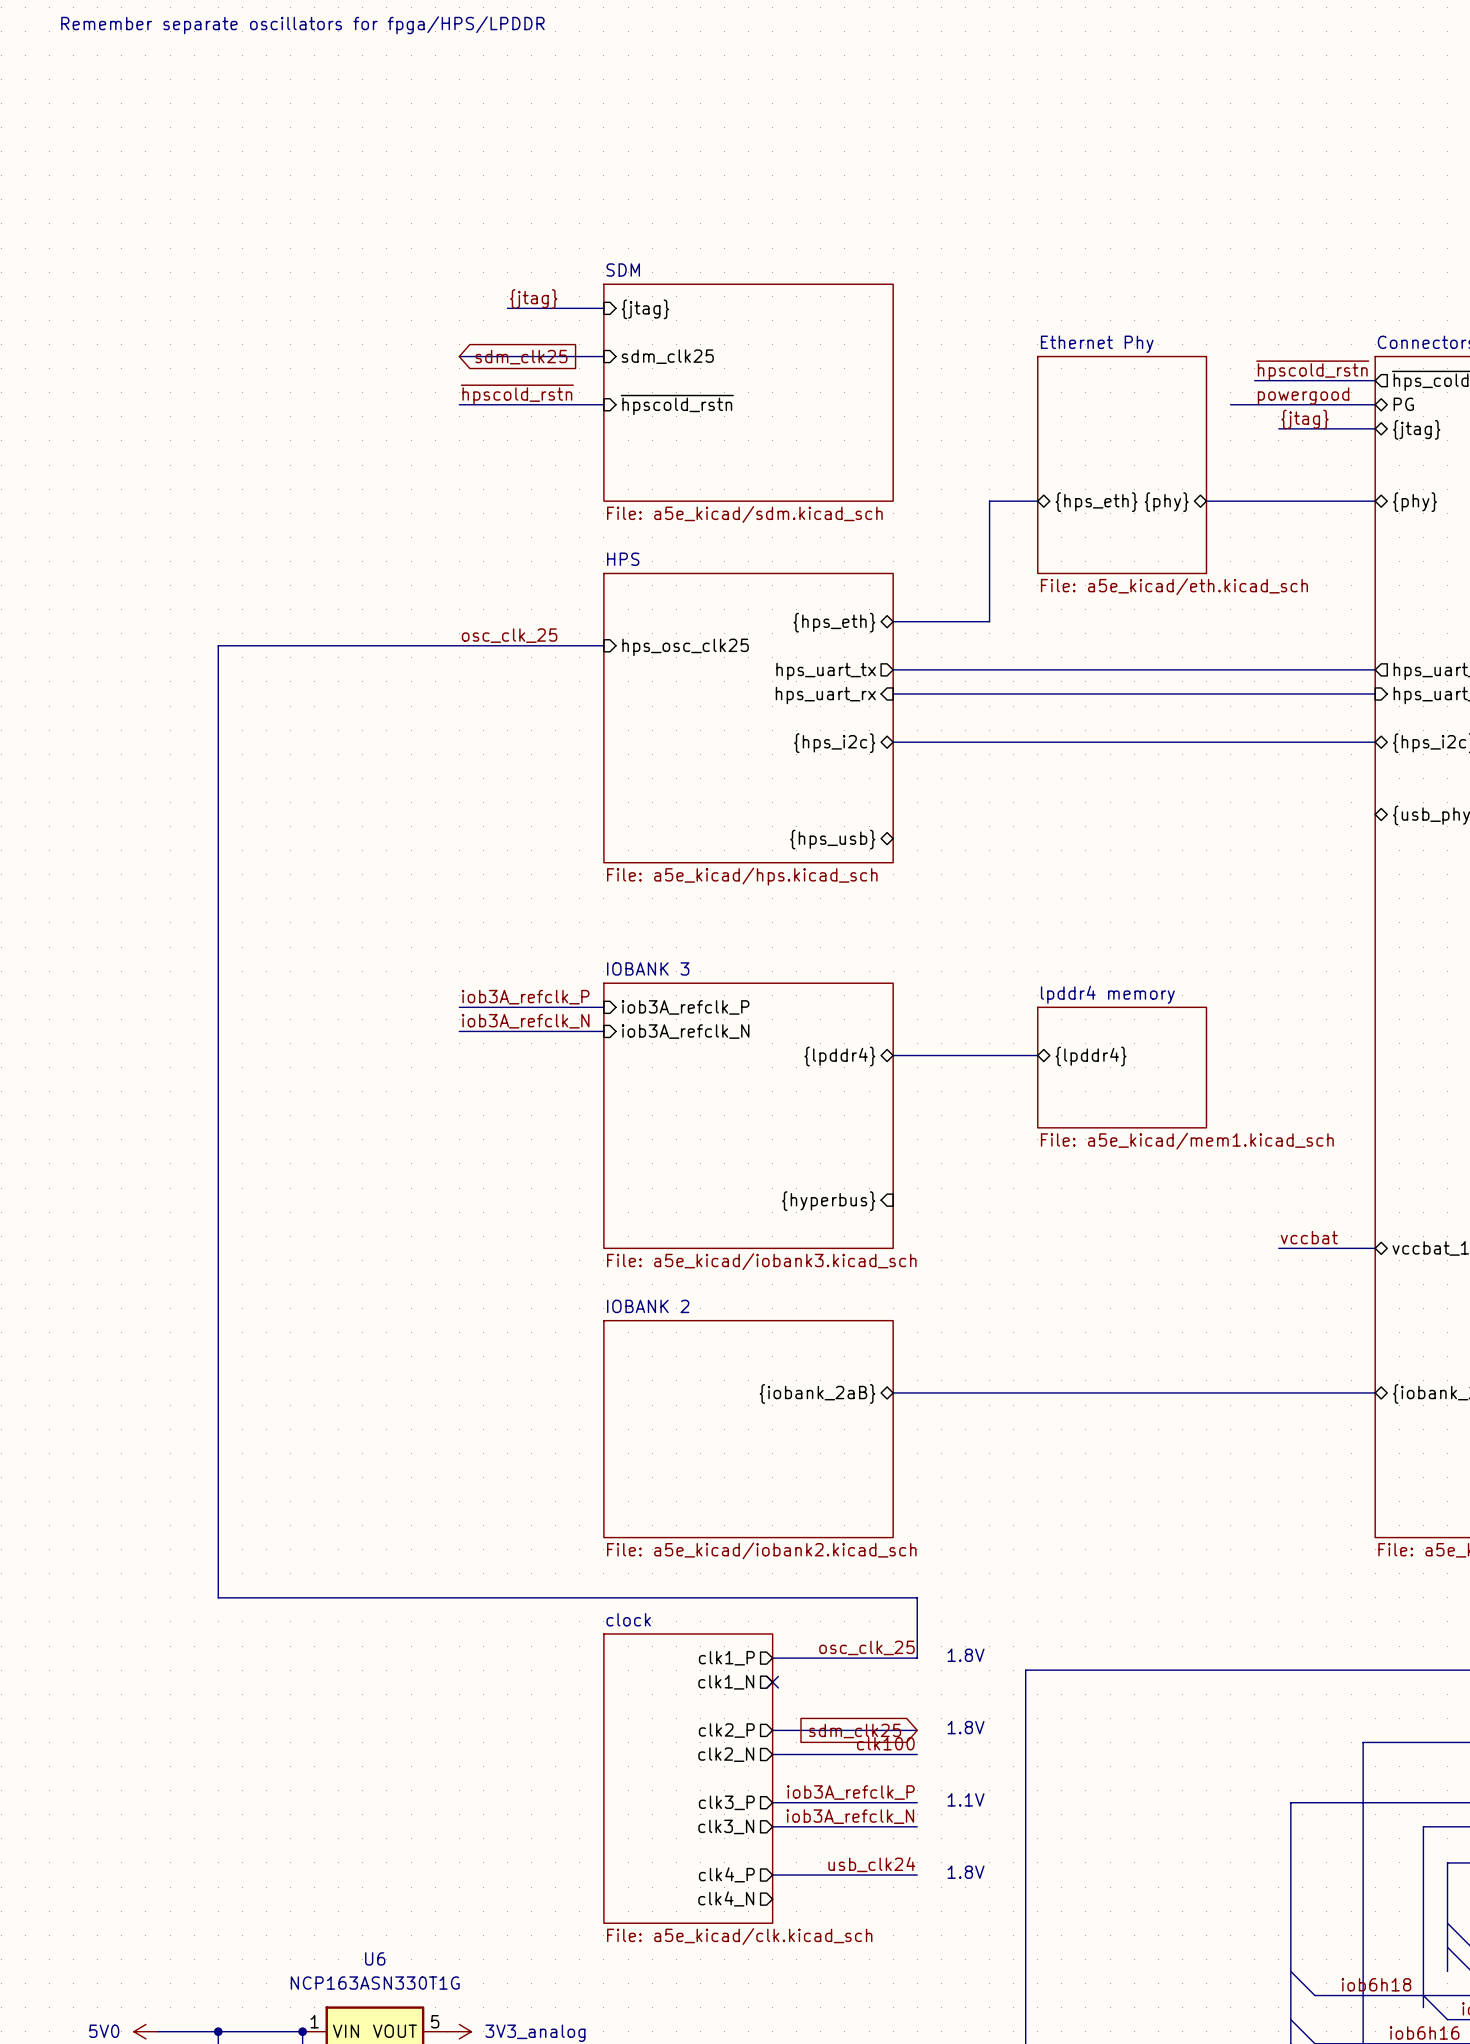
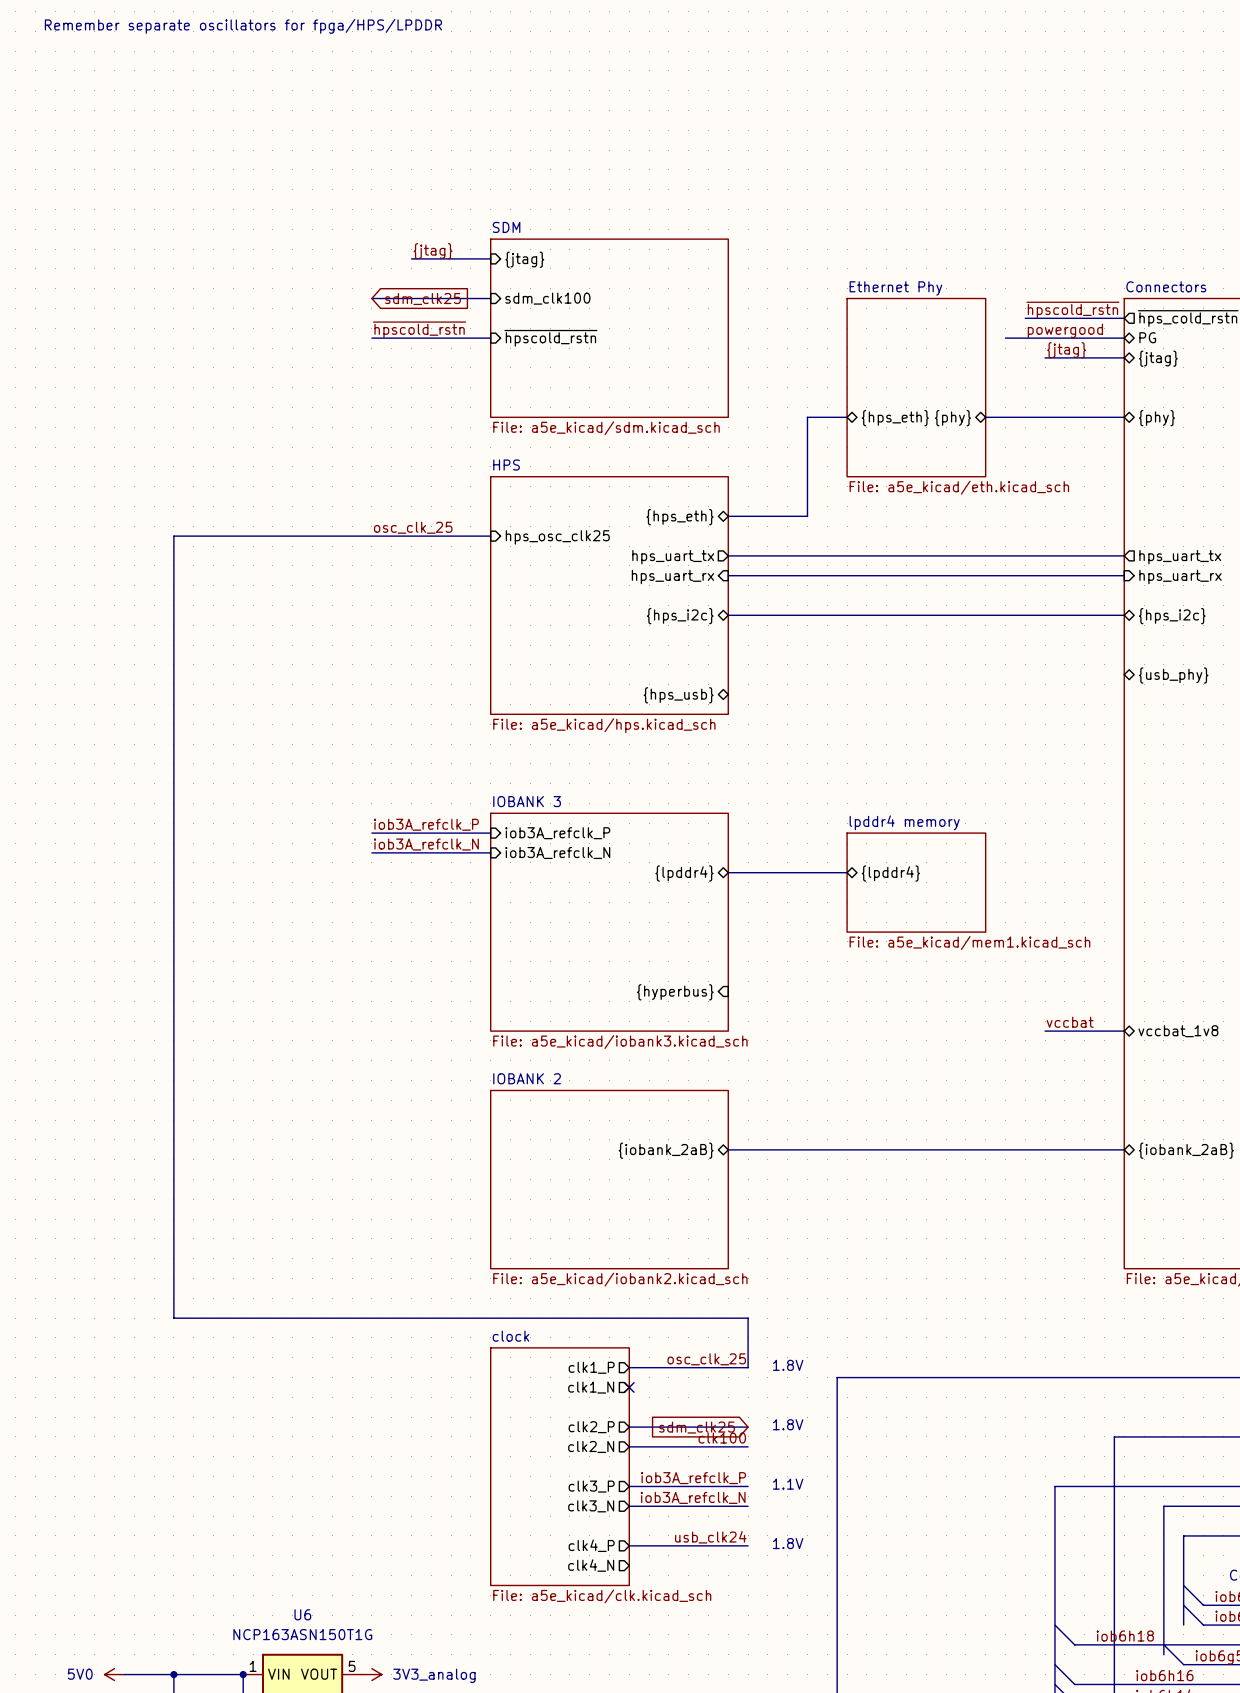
sheet pin: sdm_clk25 (667, 356) -> sdm_clk100 (547, 298)
U6 value: NCP163ASN330T1G (375, 1983) -> NCP163ASN150T1G (302, 1634)

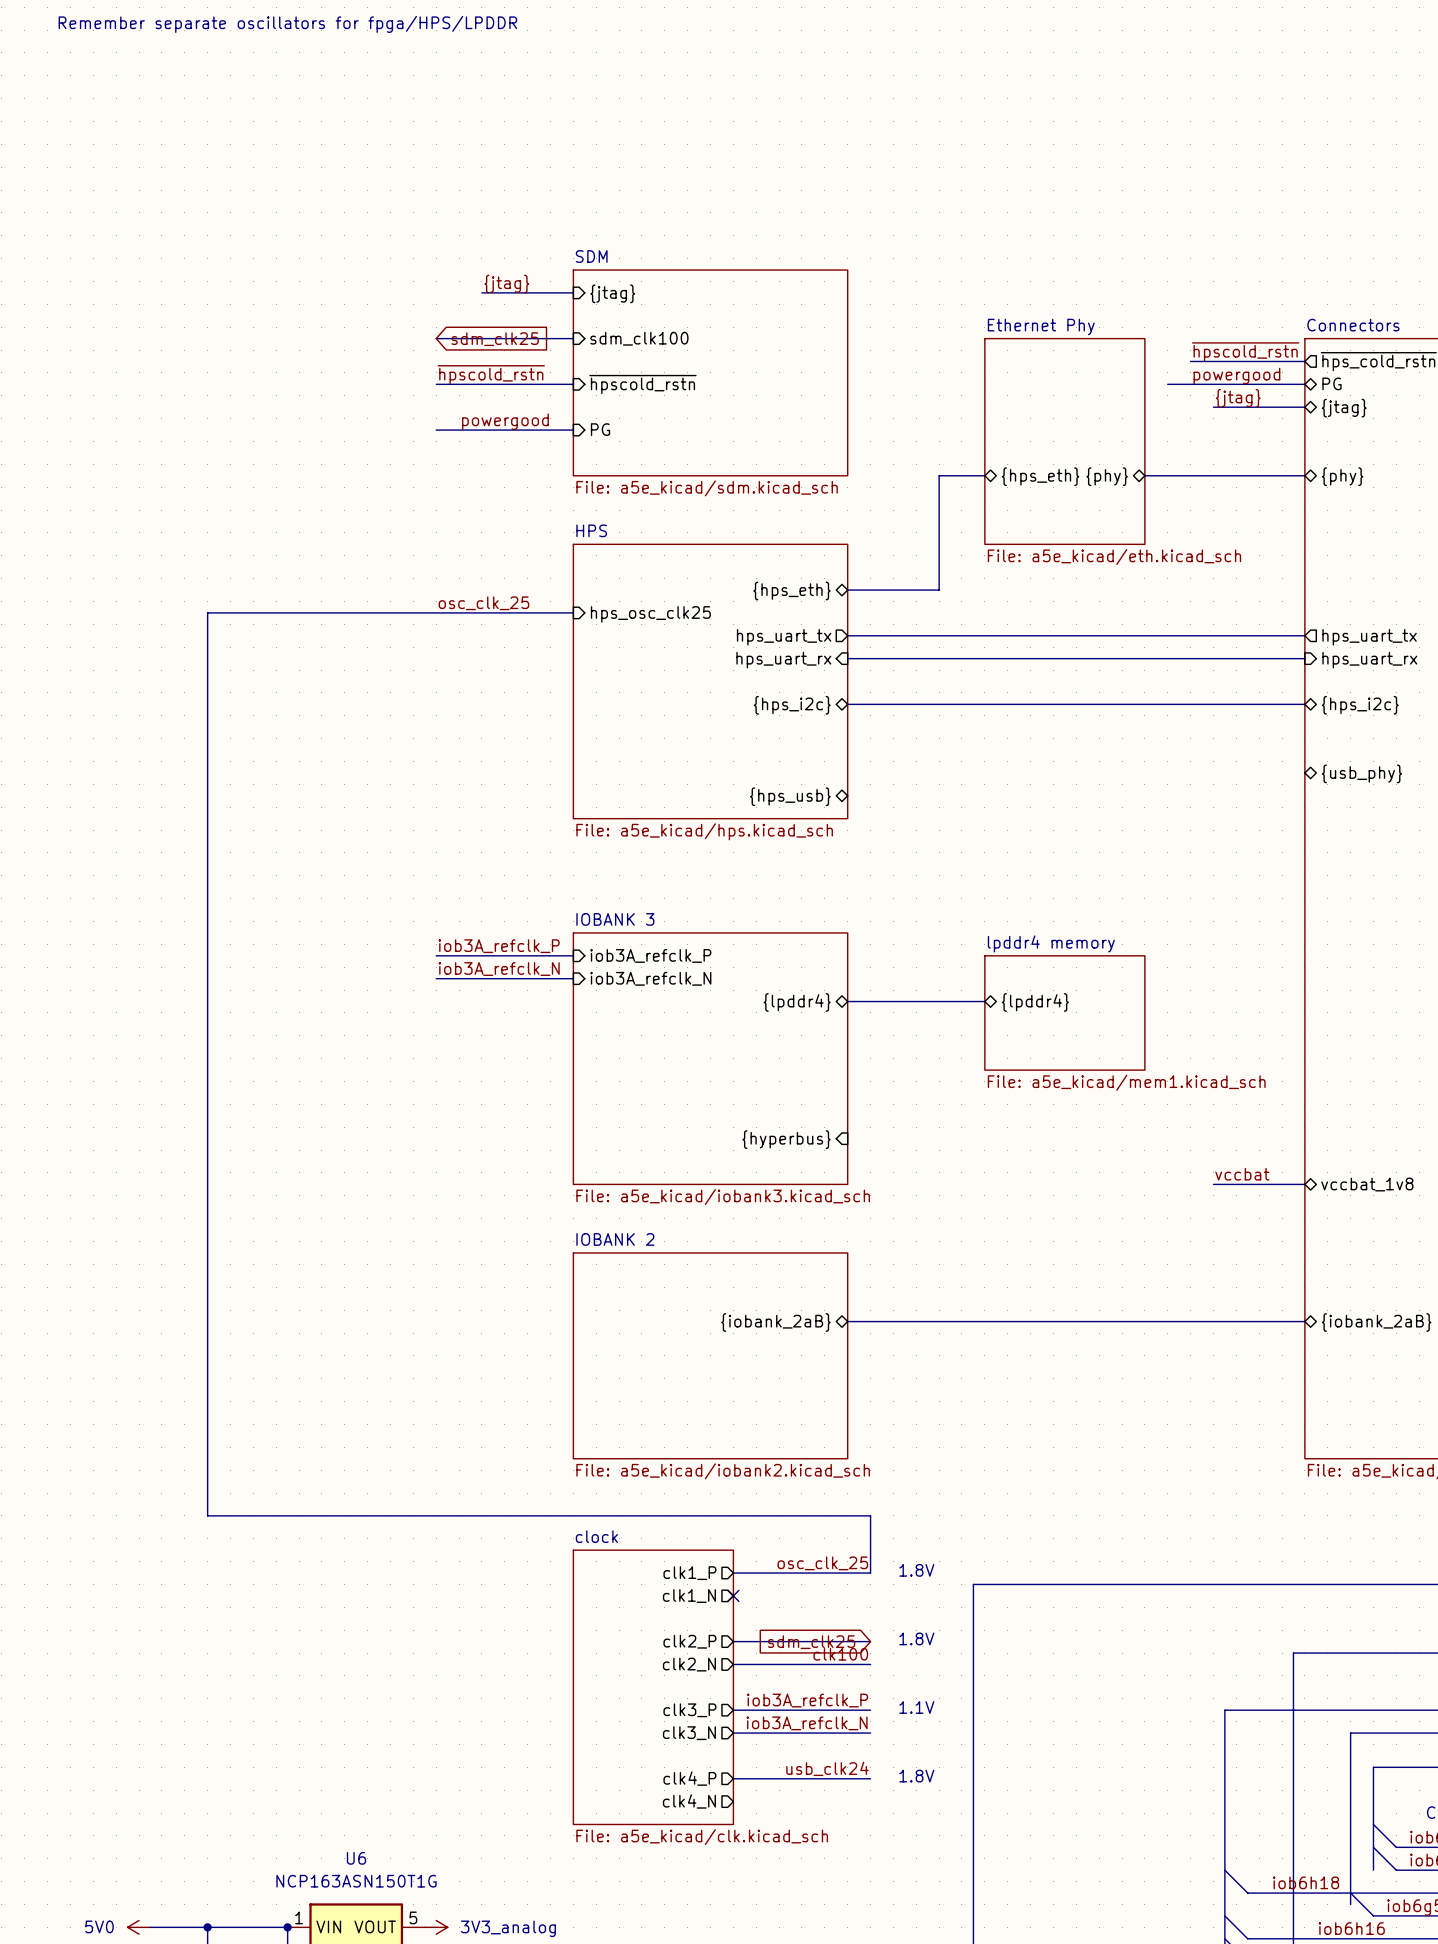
label: none -> powergood (505, 421)
wire: none -> (436, 430) (573, 430)
sheet pin: none -> PG (600, 429)

